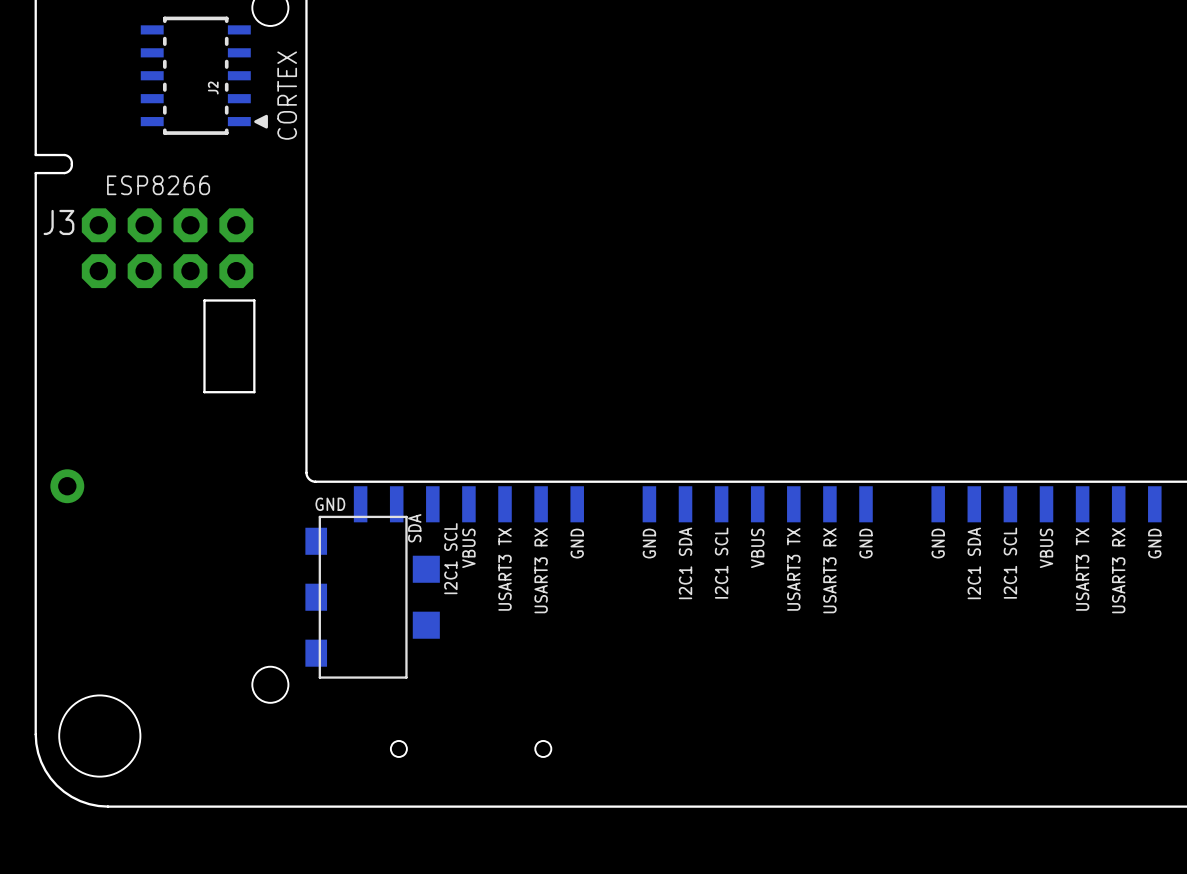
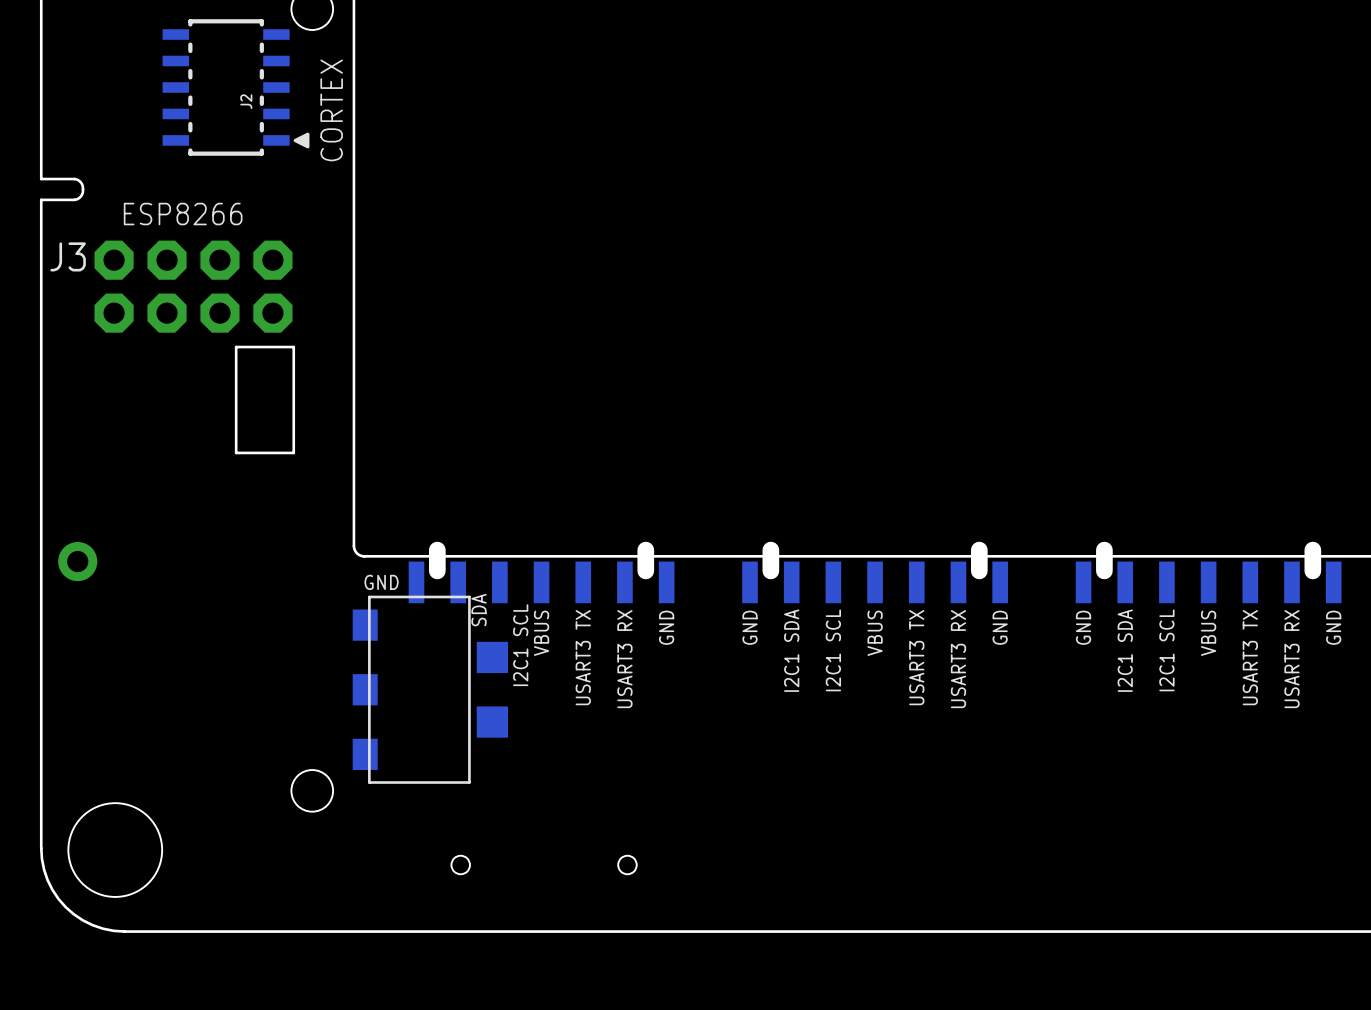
part footprint: [353, 486, 584, 523] -> [408, 541, 675, 604]
part footprint: [642, 486, 873, 523] -> [742, 541, 1008, 604]
part footprint: [931, 486, 1162, 523] -> [1075, 541, 1342, 604]

